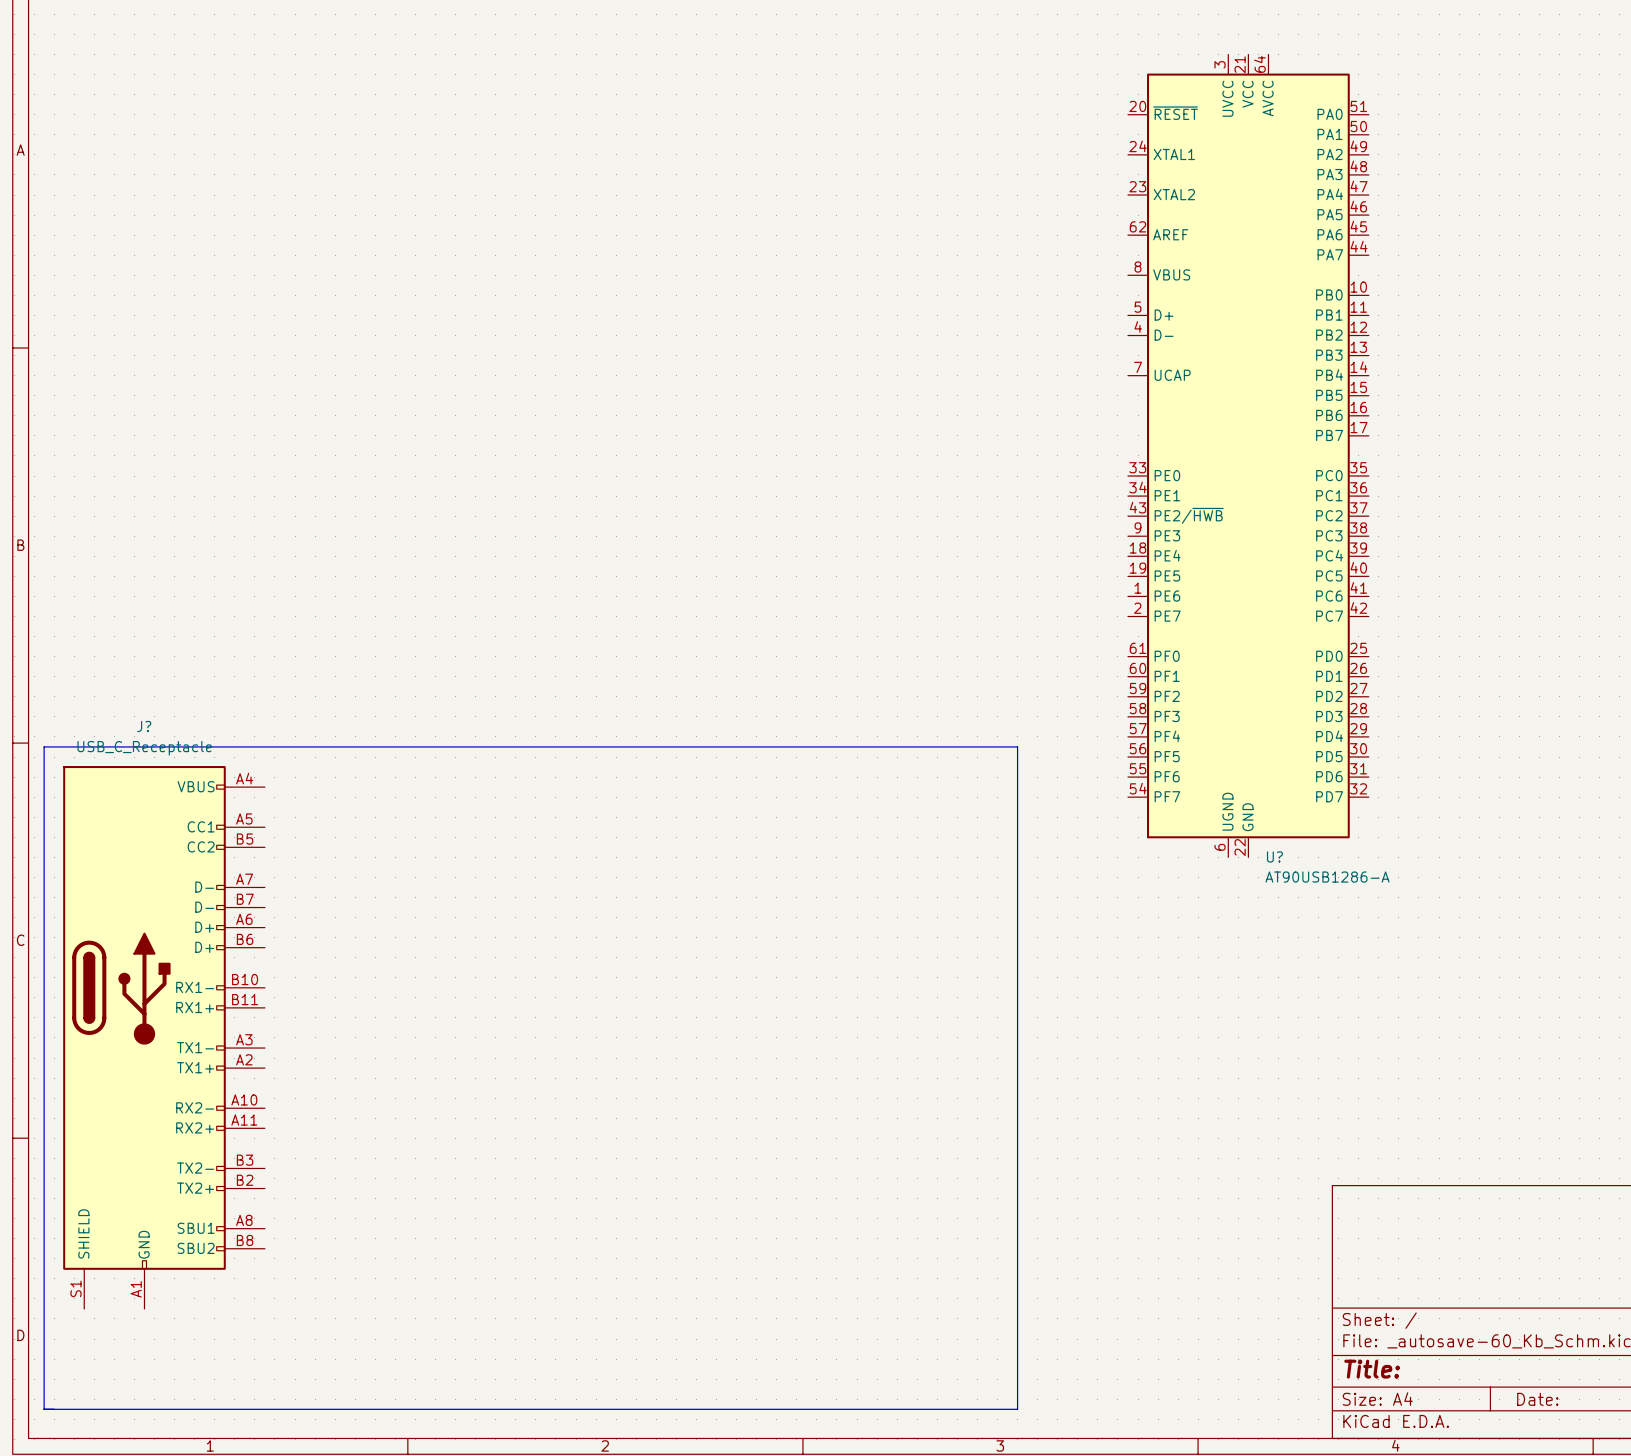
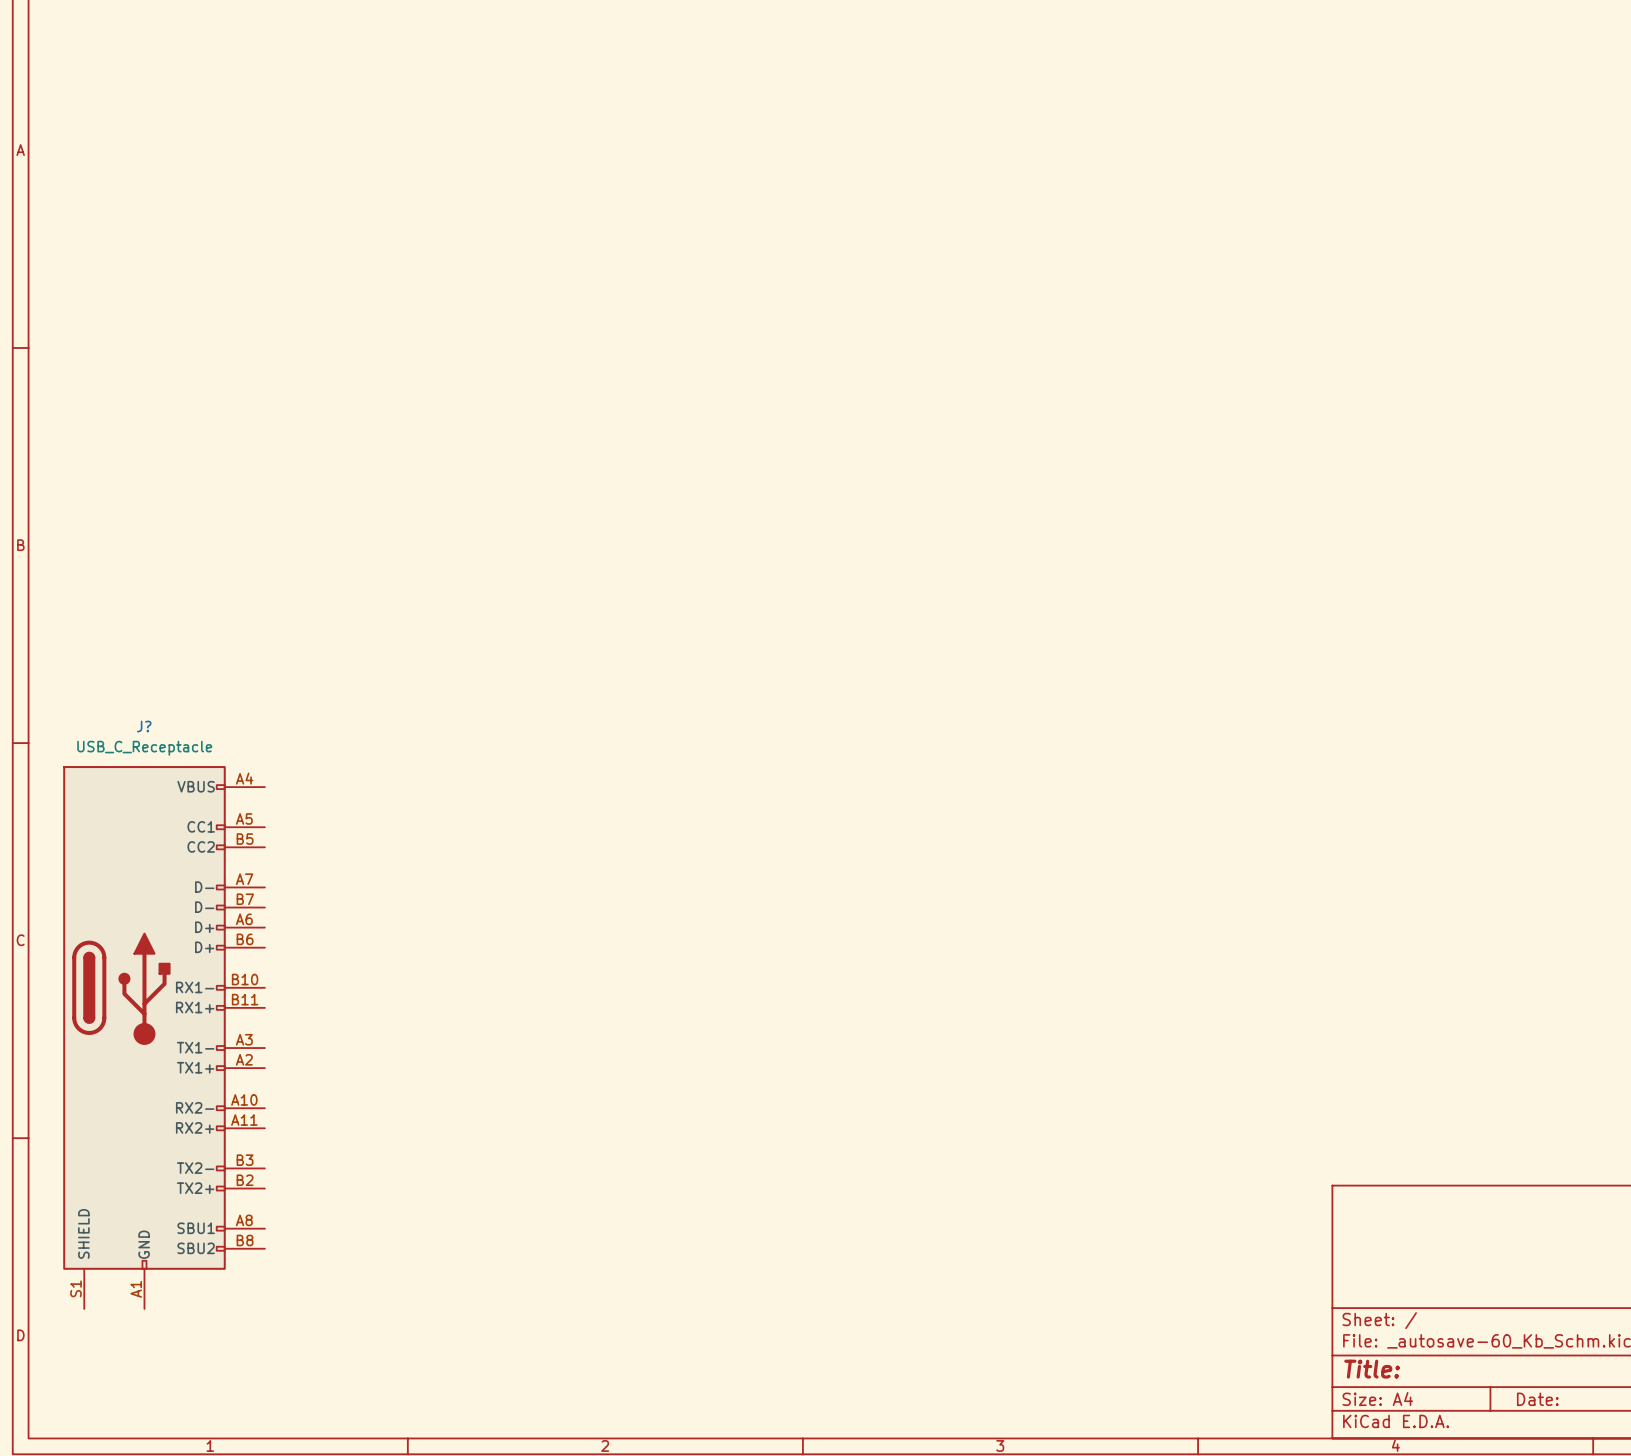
U?: AT90USB1286-A (1248, 455) -> none
line: (44, 746) (44, 1409) (1017, 1409) (1017, 746) (44, 746) -> none

